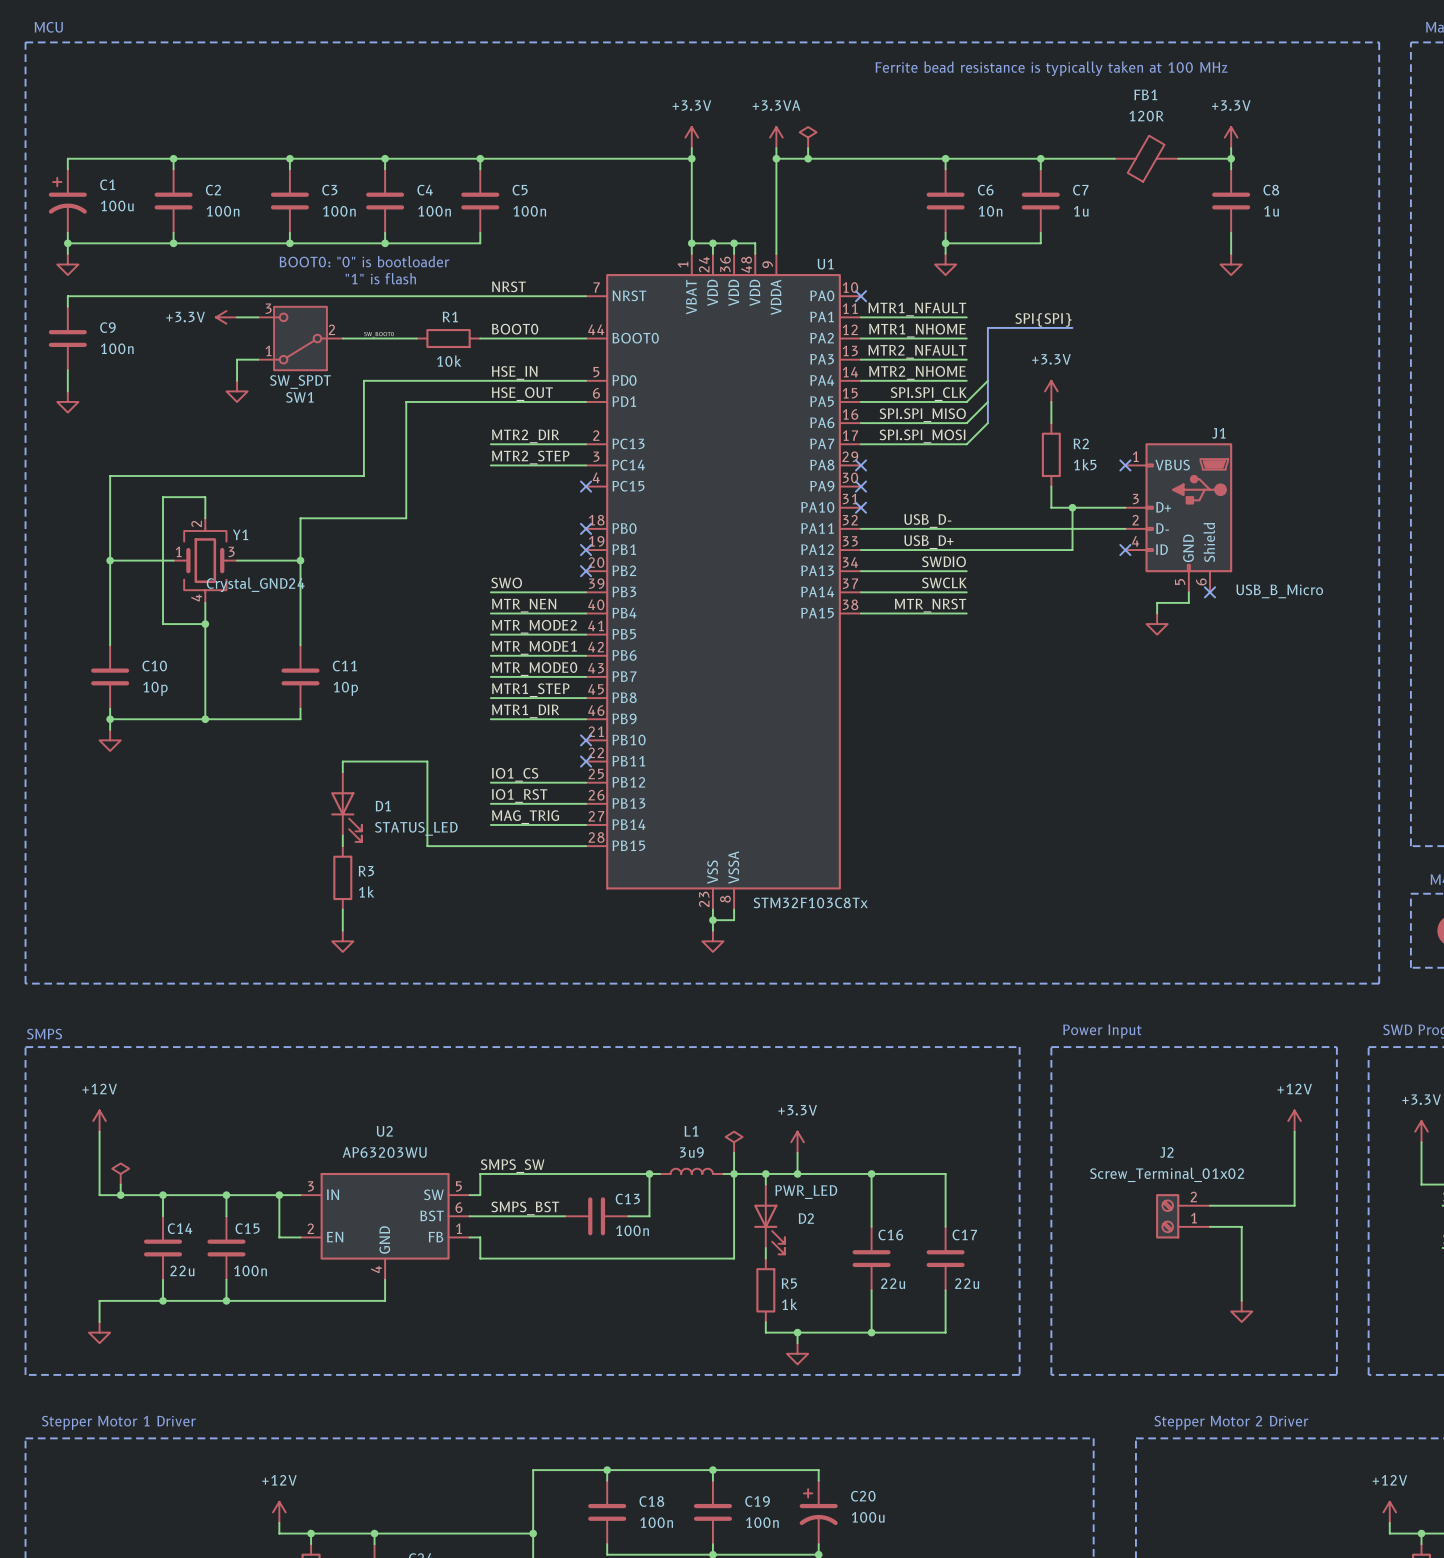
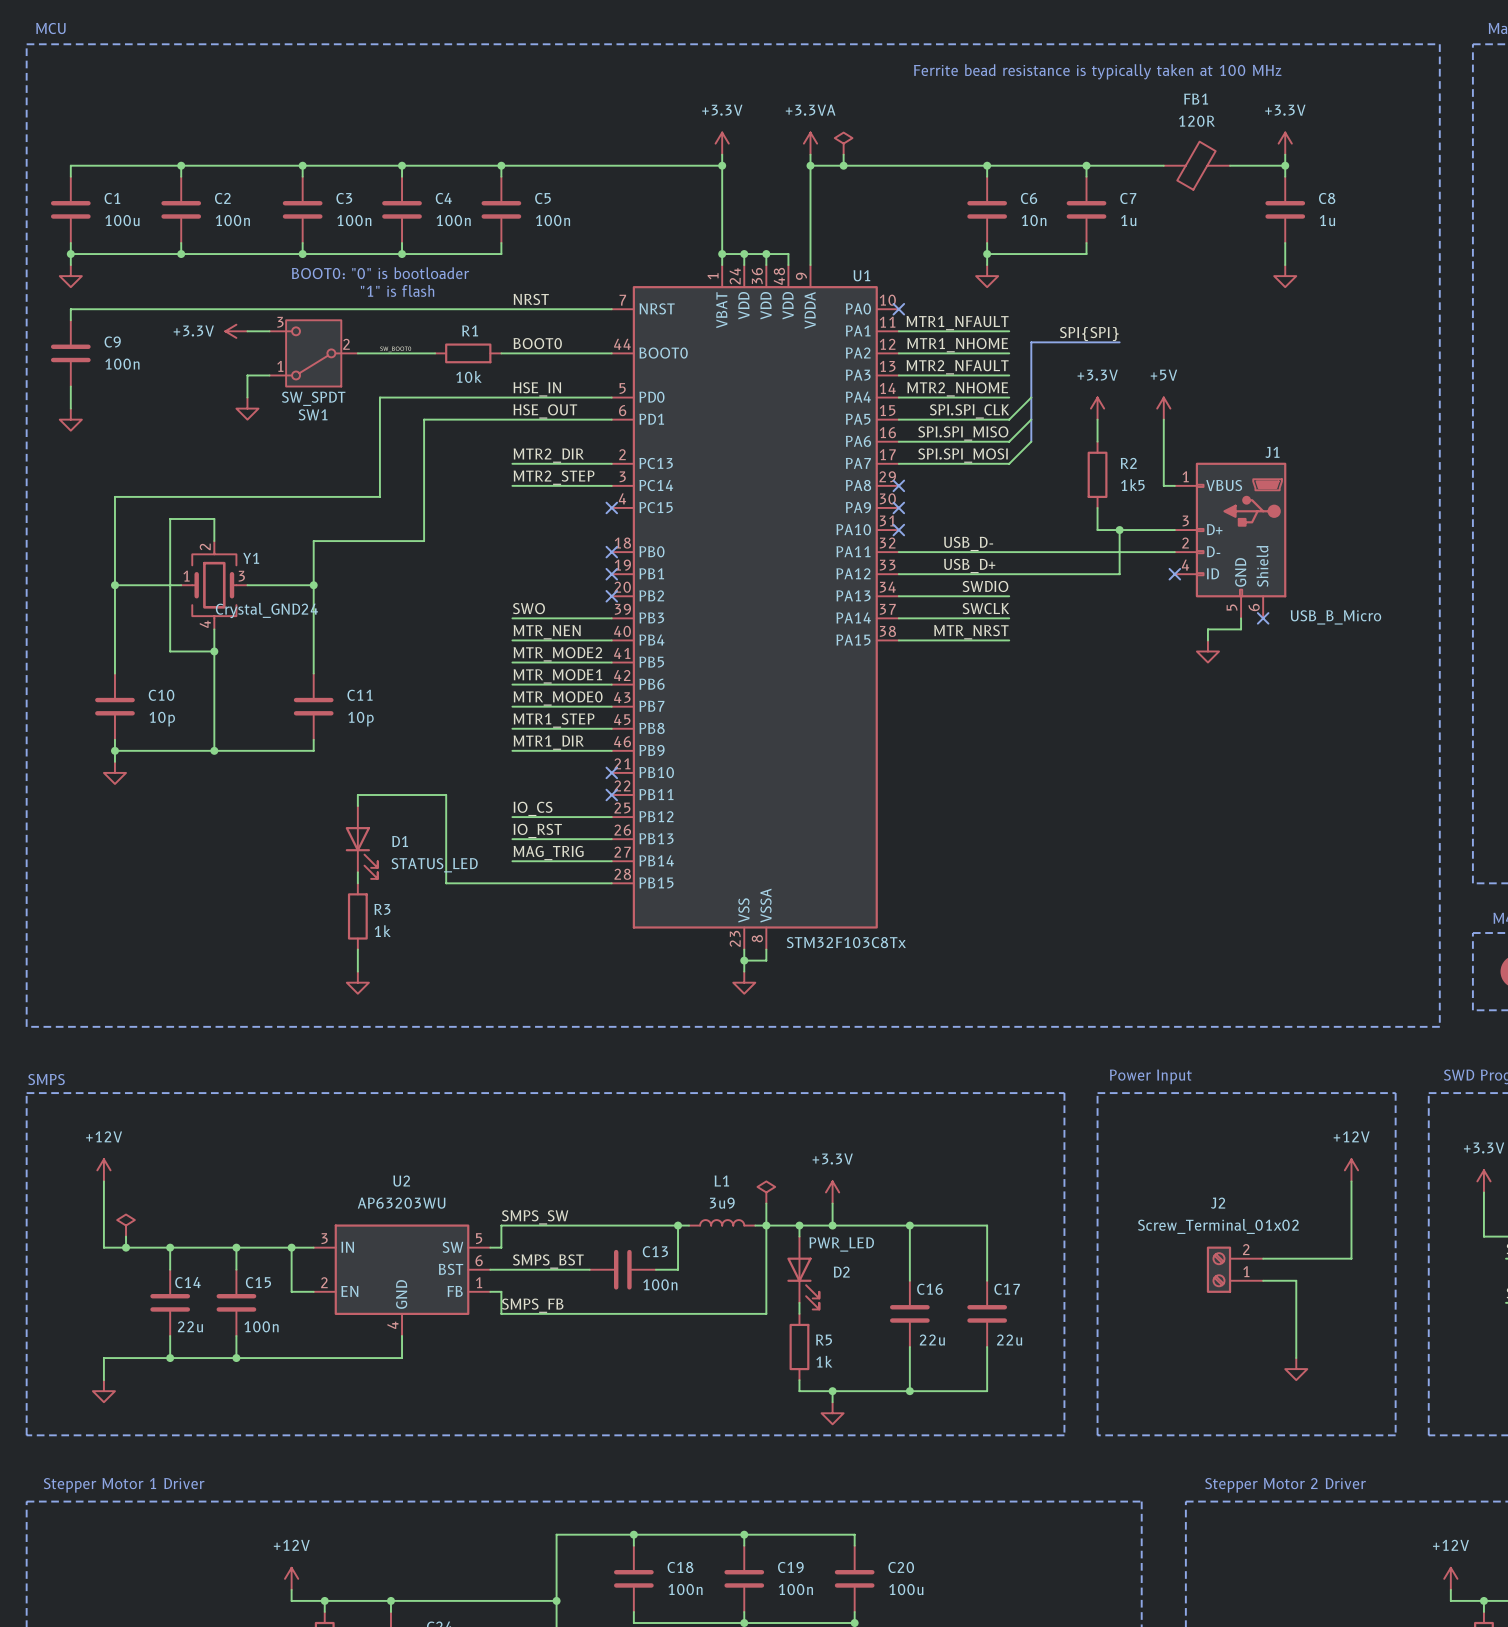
C1 symbol: [48, 169, 87, 233] -> [50, 176, 91, 243]
power symbol: none -> +5V (1163, 408)
wire: none -> (1163, 419) (1163, 485) (1174, 485)
no-connect mark: (1125, 465) -> none
label: IO1_CS (515, 774) -> IO_CS (533, 808)
label: IO1_RST (519, 795) -> IO_RST (537, 830)
label: none -> SMPS_FB (532, 1305)
C20 symbol: [799, 1480, 838, 1545] -> [834, 1545, 875, 1612]

